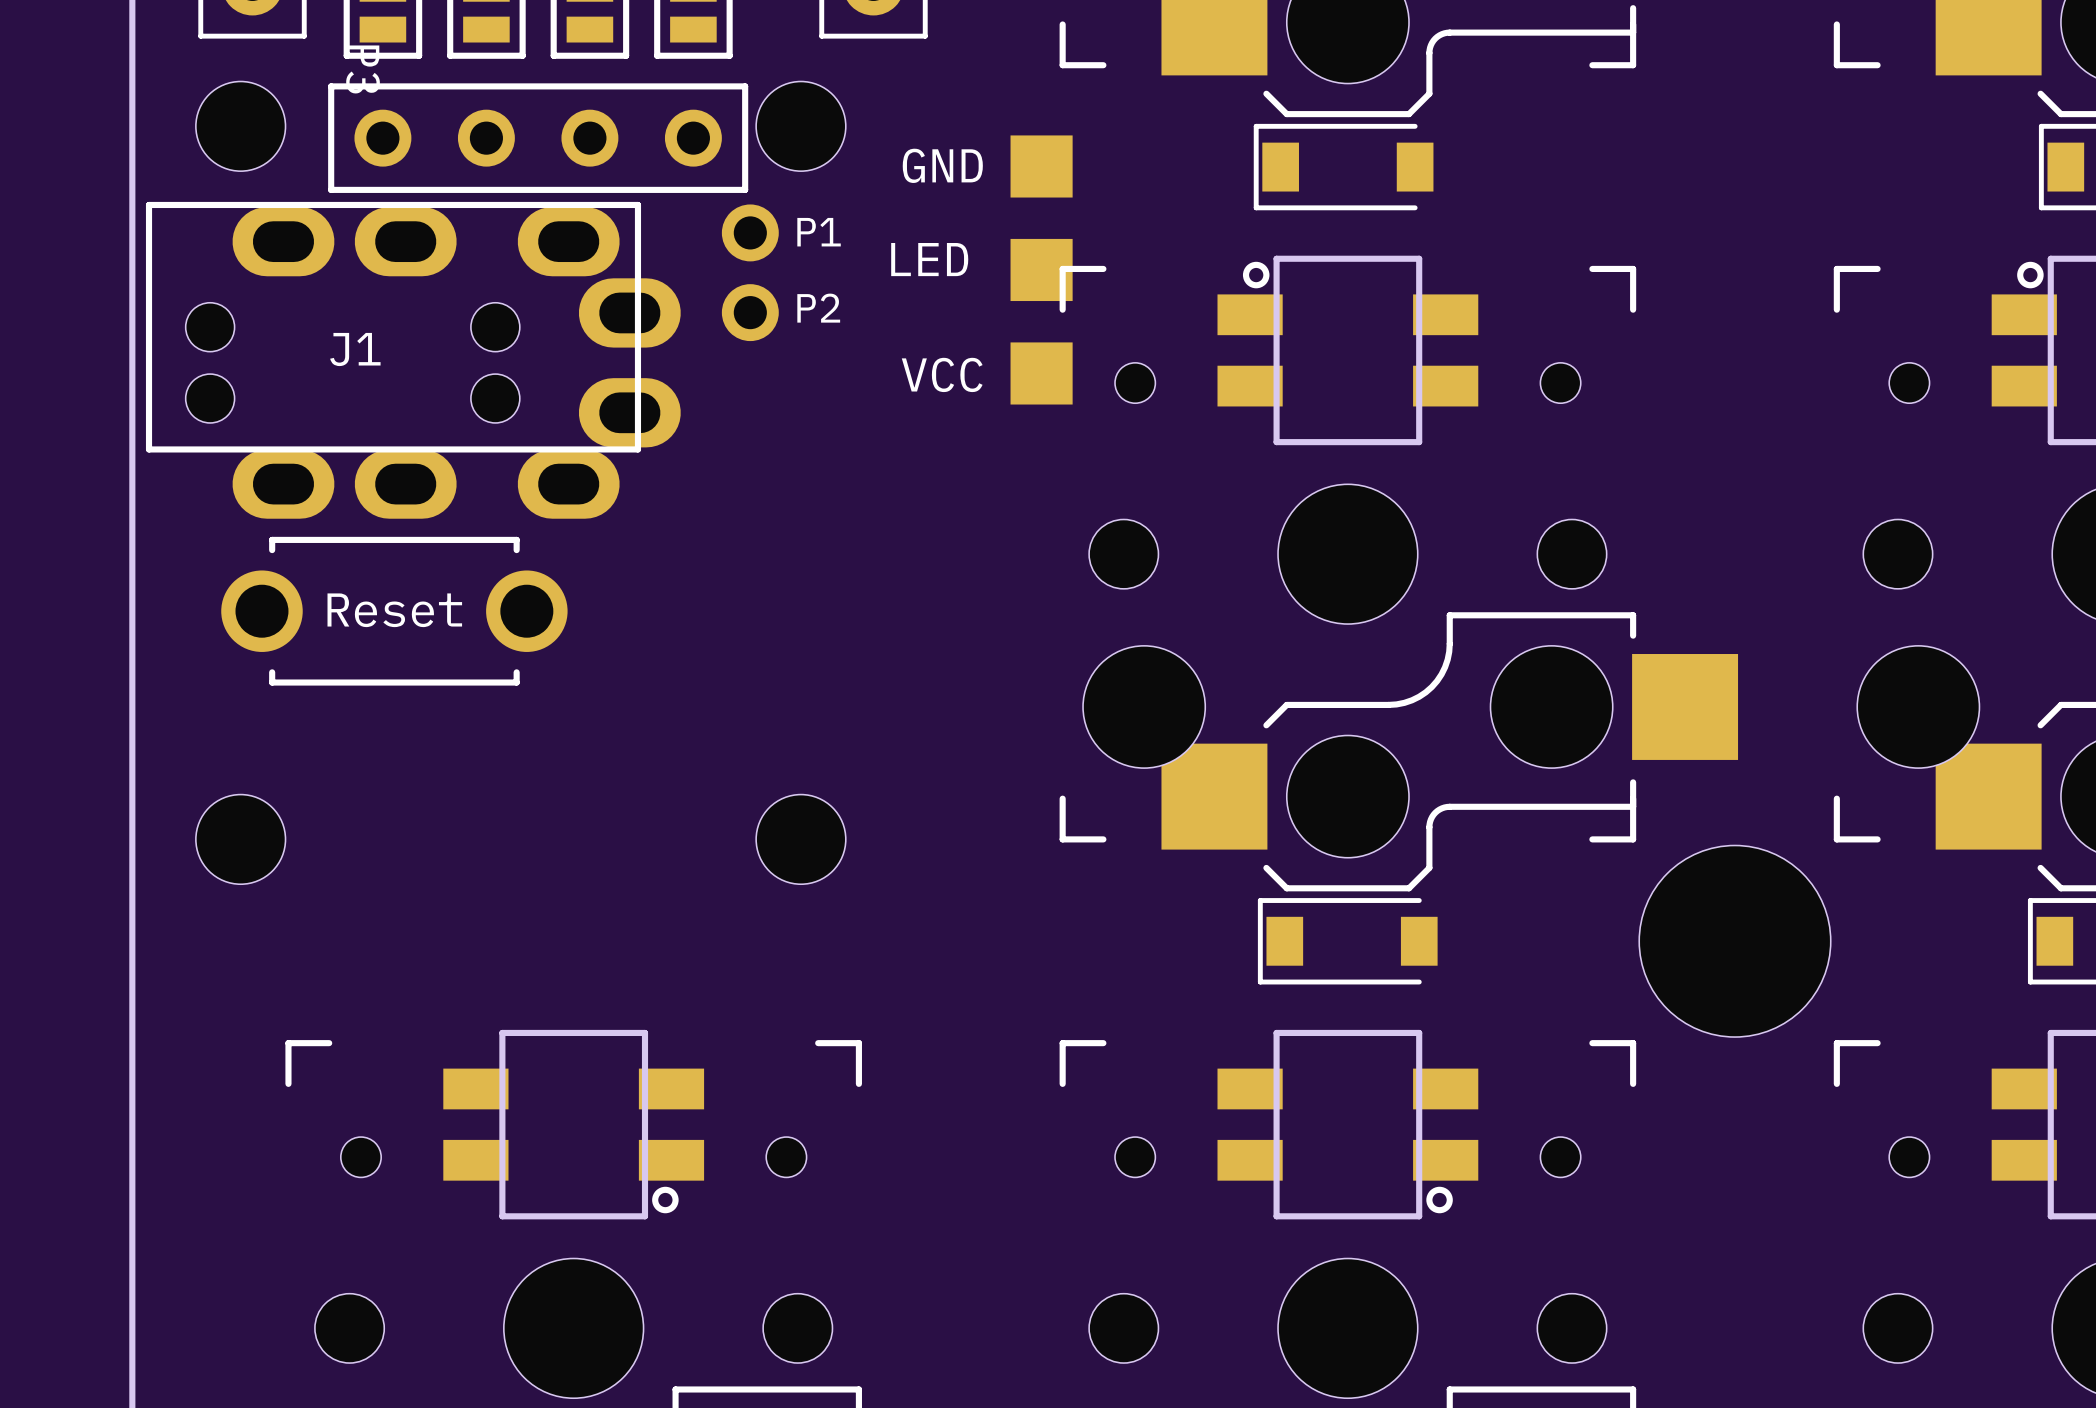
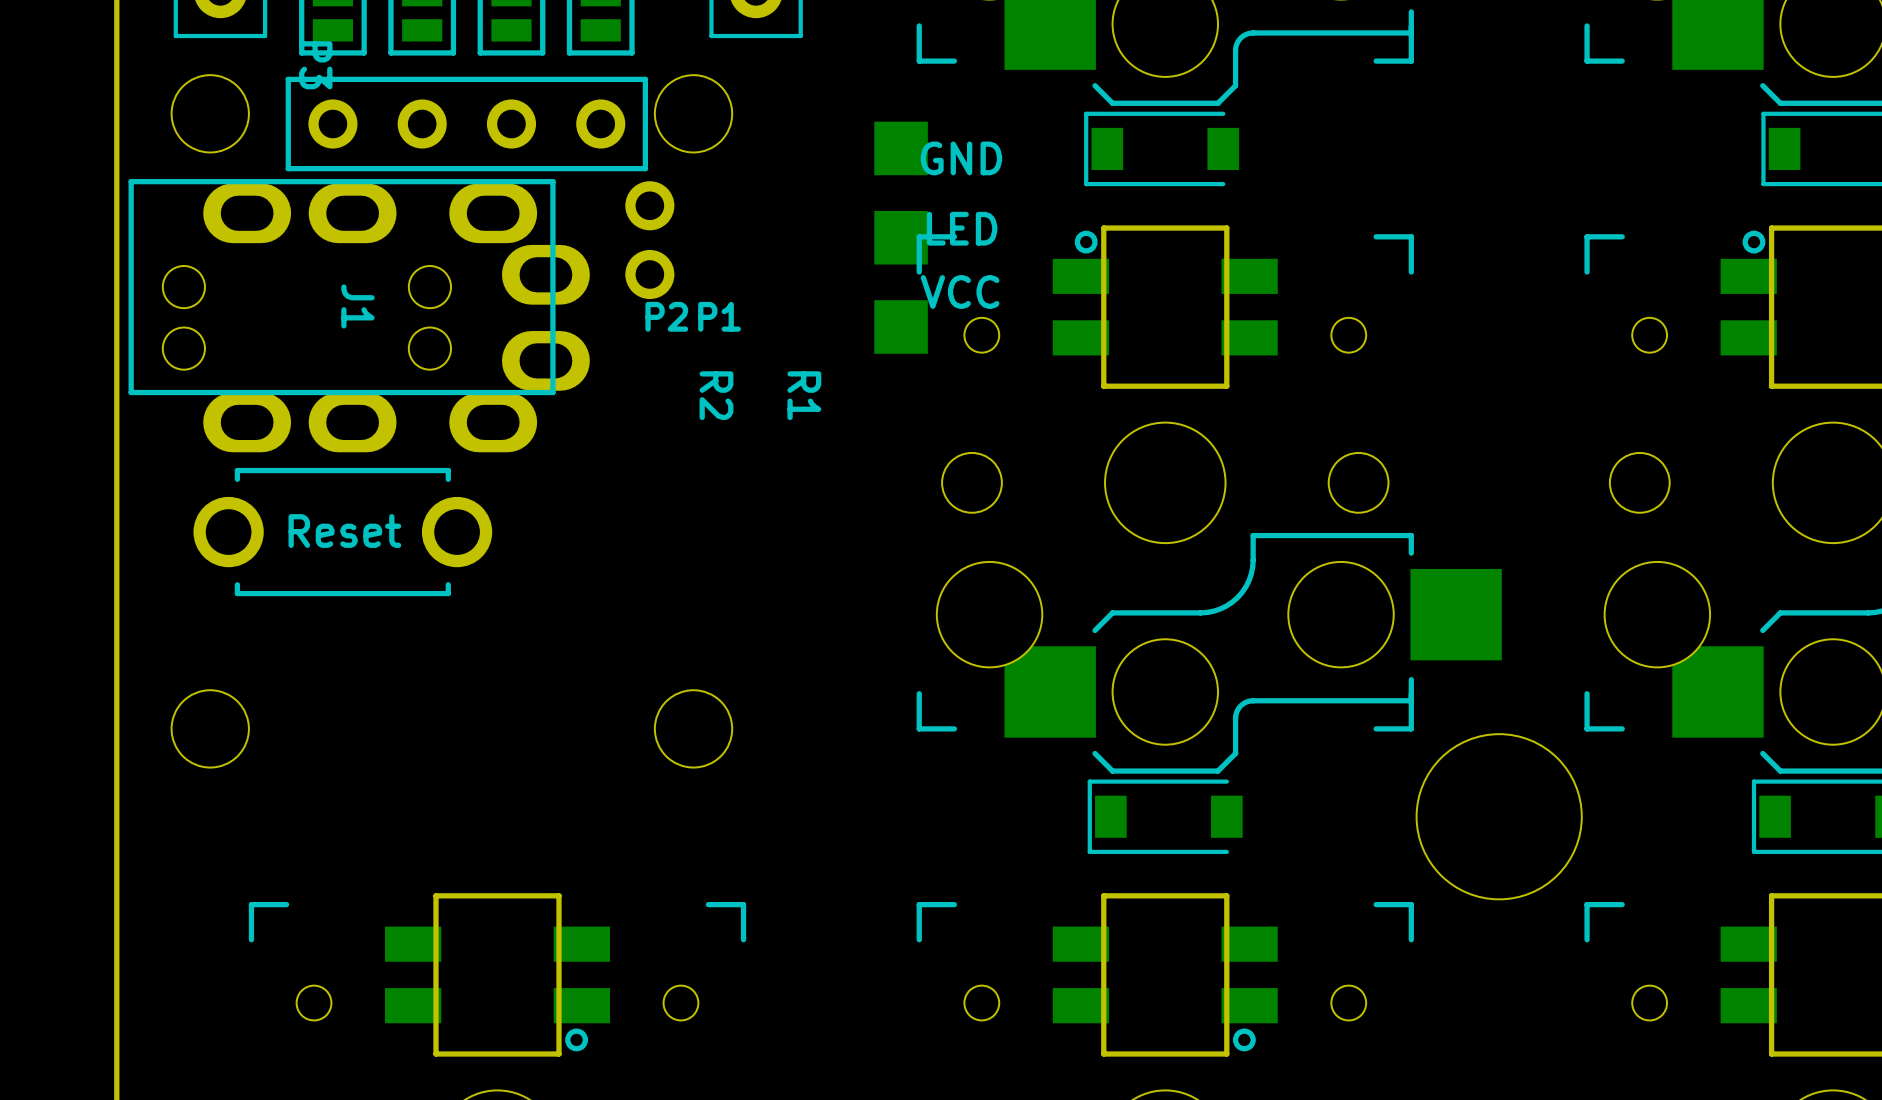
text position: GND (942, 165) -> GND (961, 158)
text position: P1 (819, 232) -> P1 (719, 316)
text position: LED (929, 259) -> LED (962, 228)
text position: P2 (818, 308) -> P2 (666, 316)
text rotation: 0° (355, 349) -> 90° clockwise (357, 306)
text position: VCC (942, 374) -> VCC (960, 291)
text: none -> R2 (716, 395)
text: none -> R1 (804, 395)

